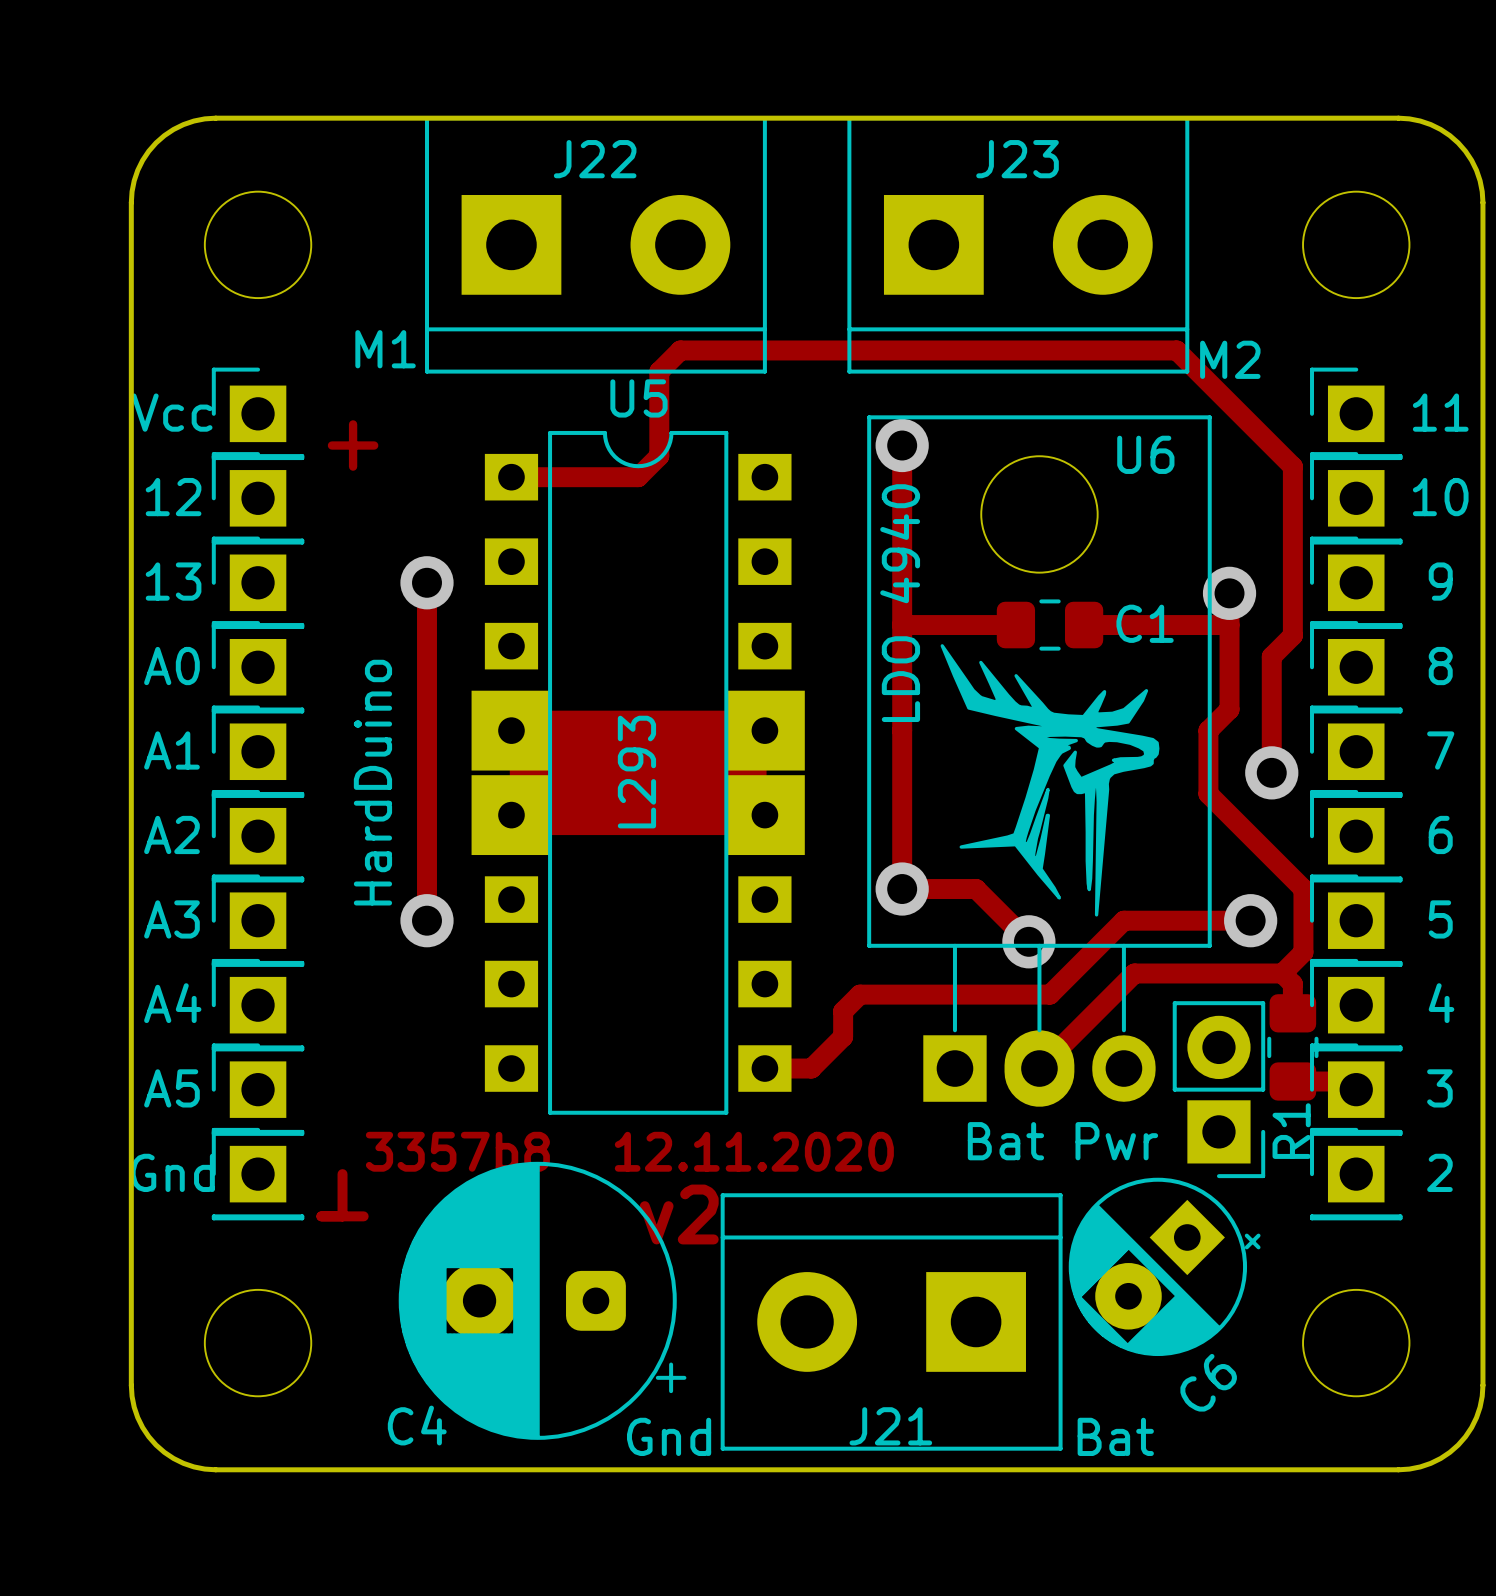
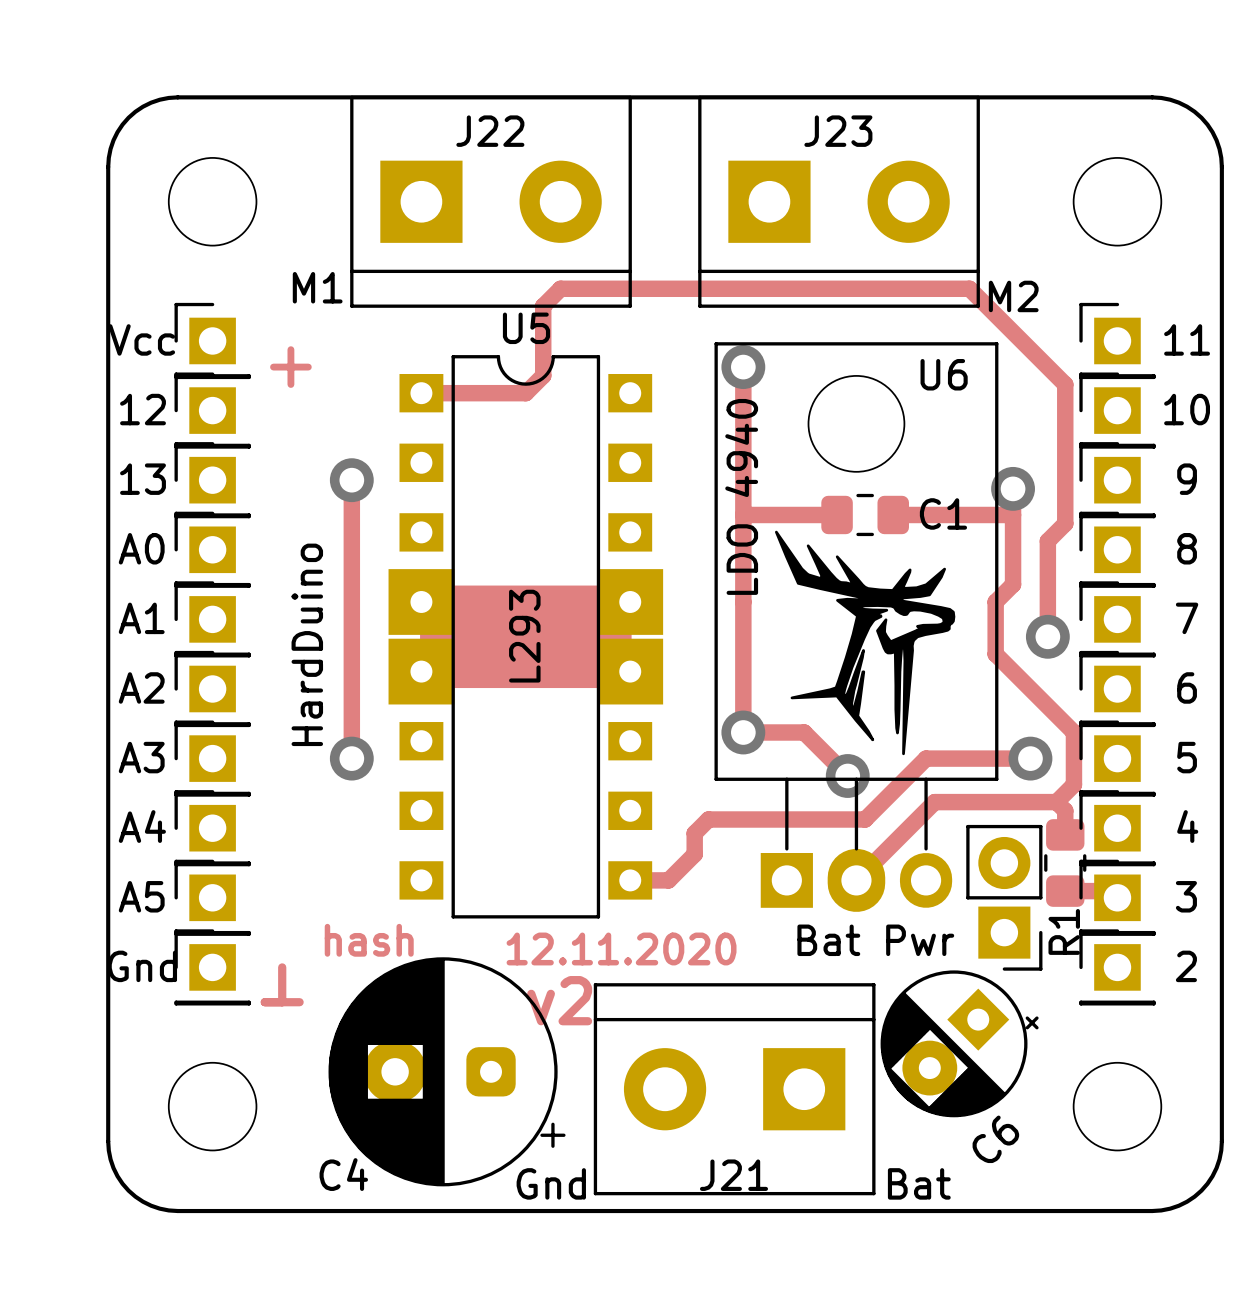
text: 3357b8 (457, 1151) -> hash (369, 940)

